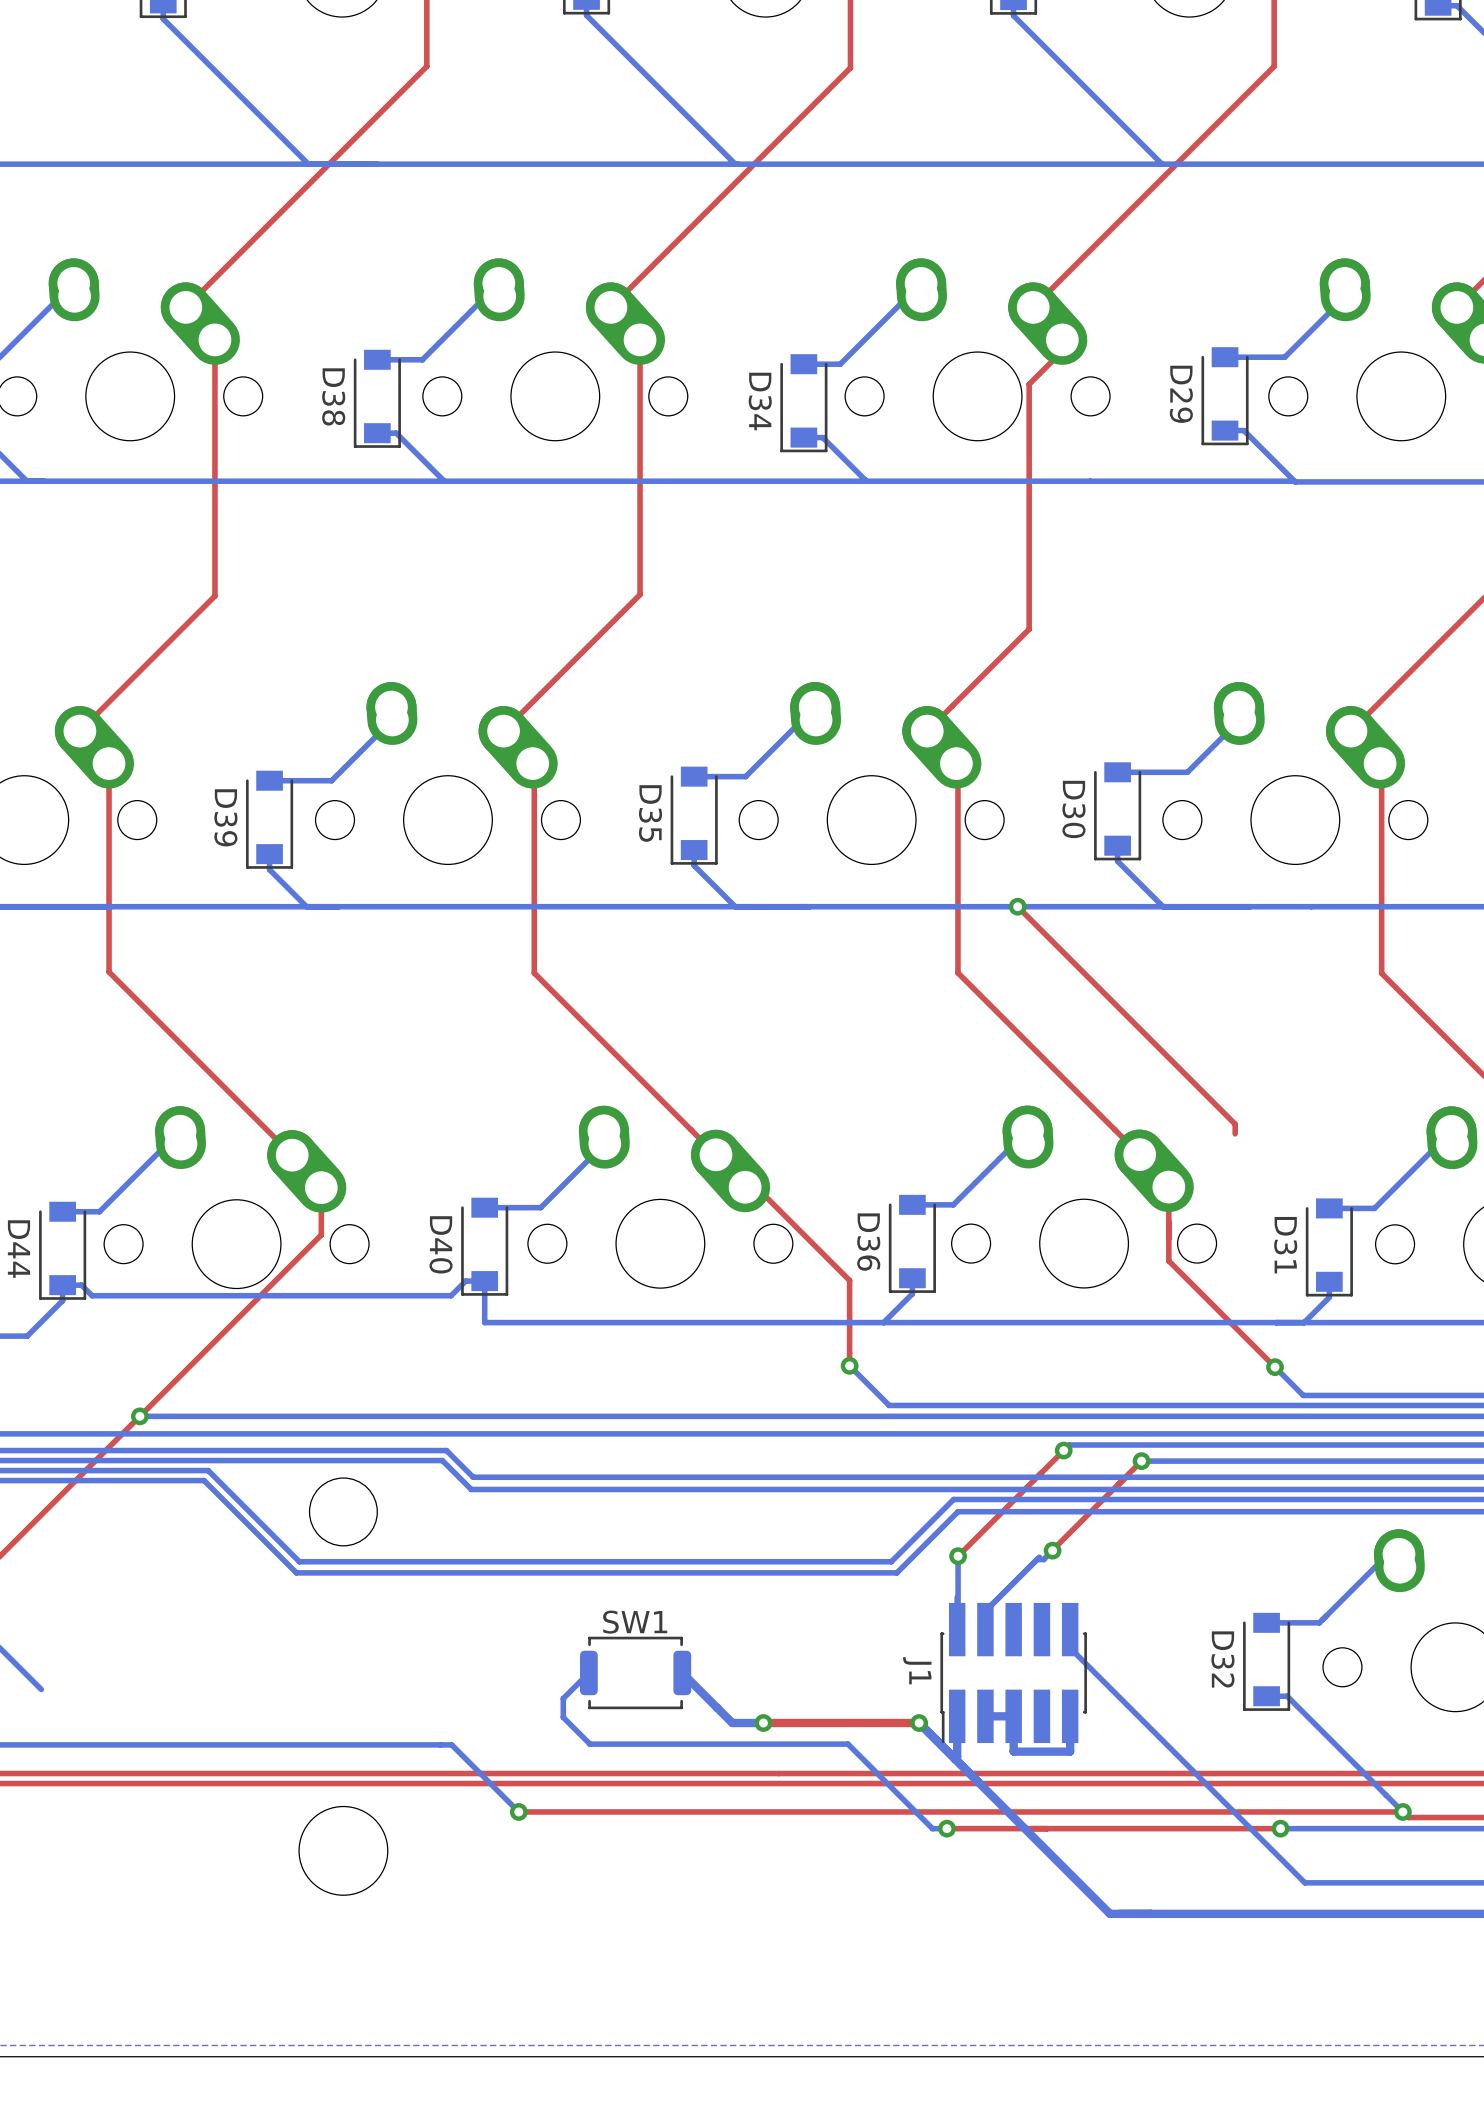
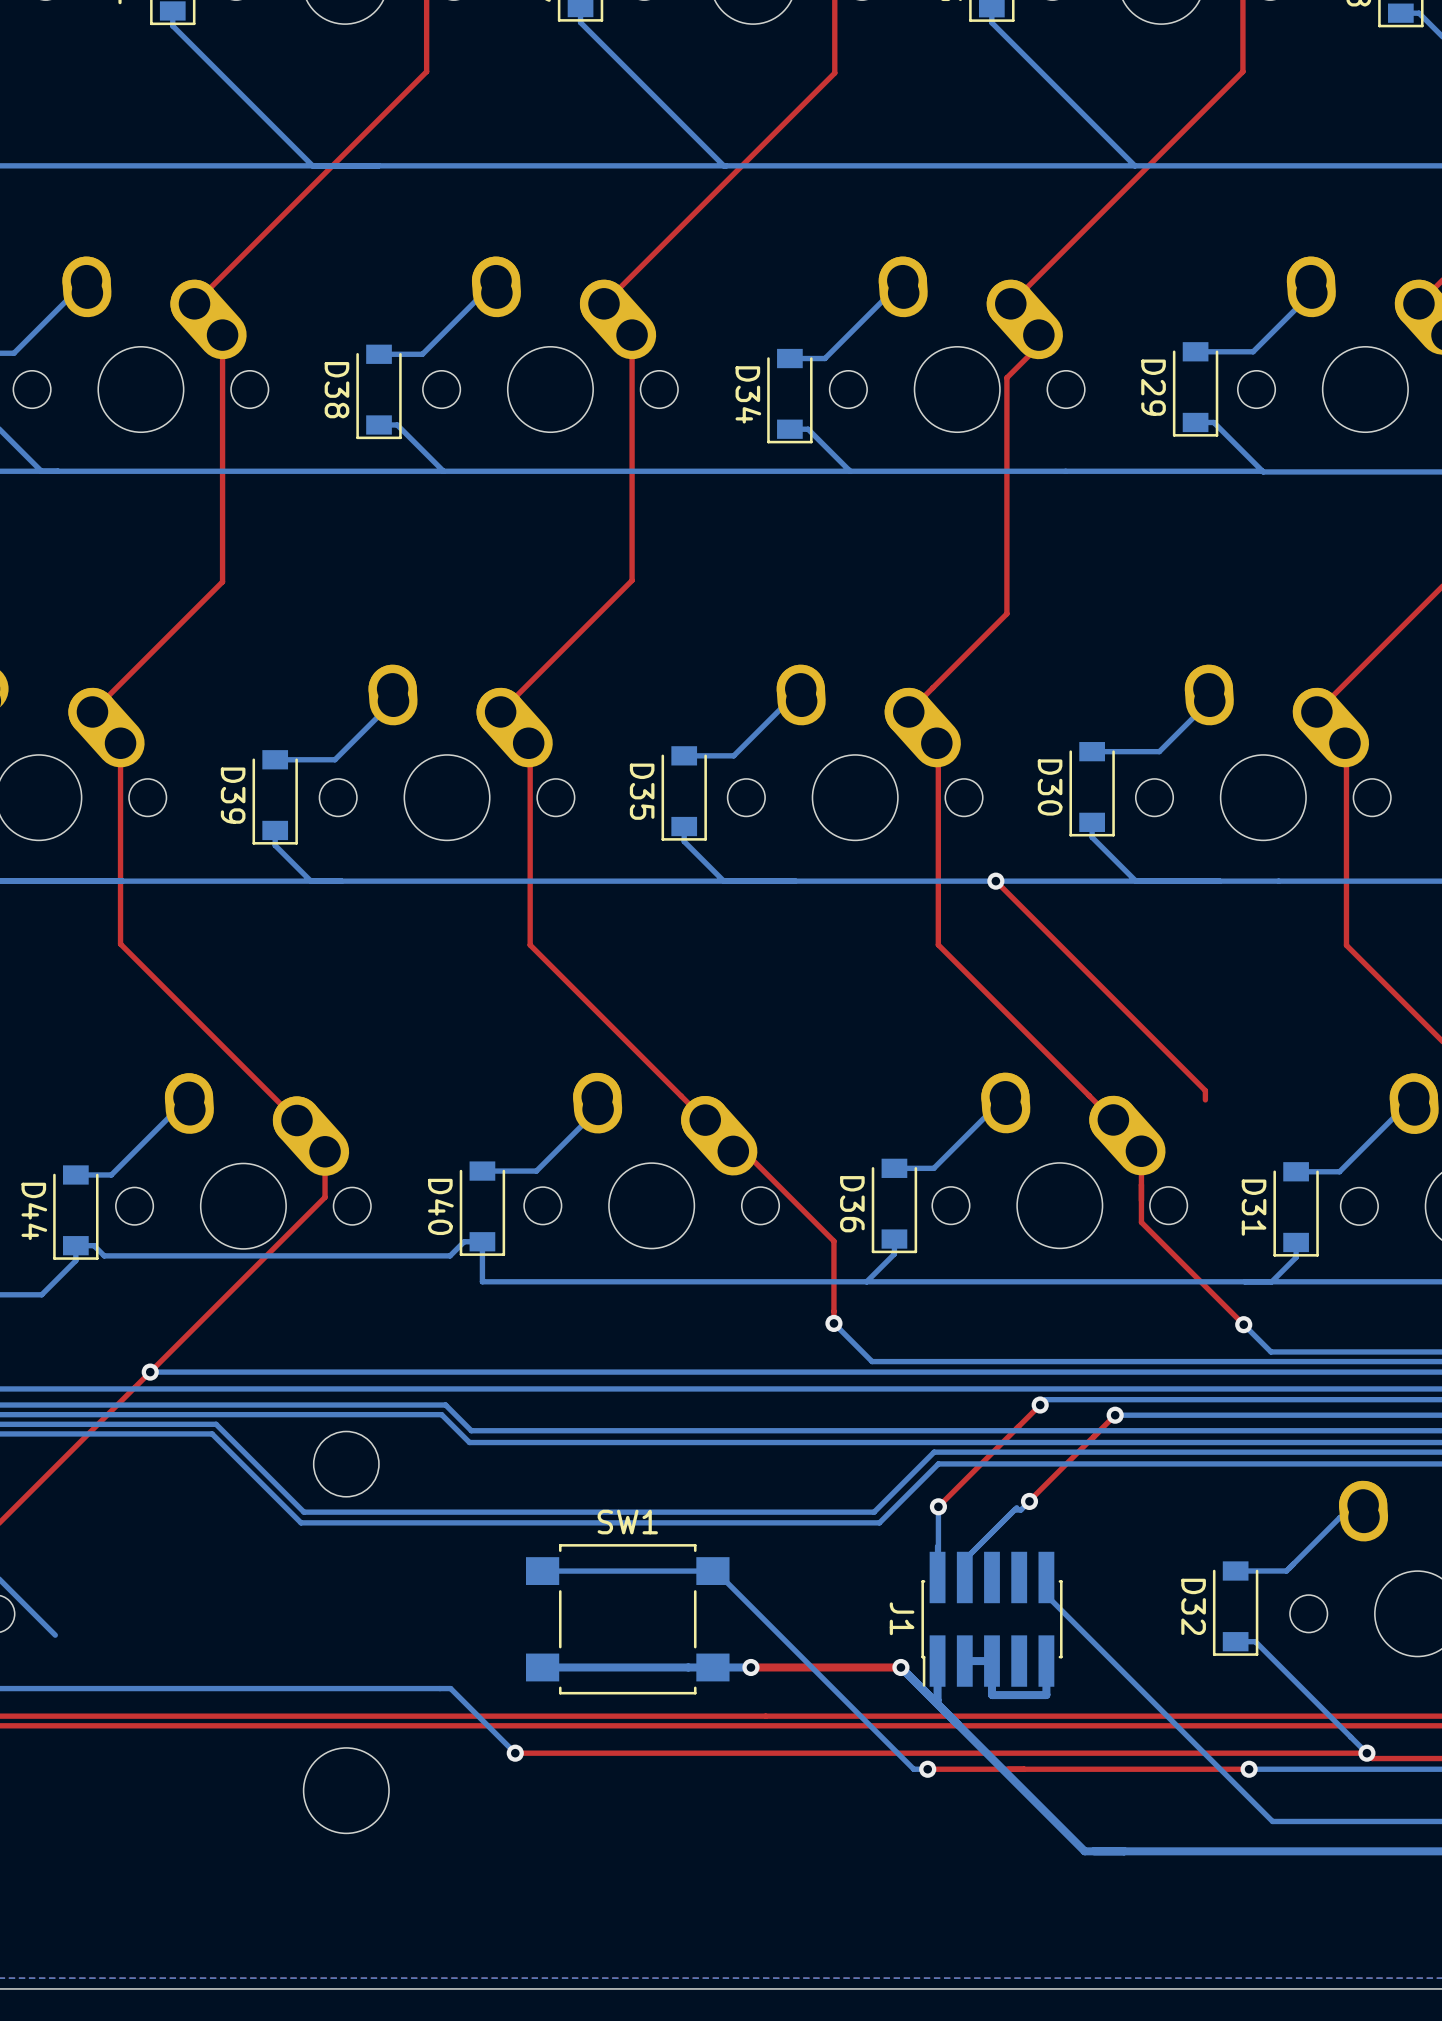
SW1 name position: SW1 (635, 1622) -> SW1 (627, 1522)
SW1 footprint: [579, 1636, 692, 1710] -> [526, 1544, 730, 1695]
bottom track: (588, 1672) (563, 1698) (563, 1717) (589, 1744) (847, 1744) -> (542, 1571) (715, 1571) (832, 1687)
bottom track: (682, 1672) (732, 1723) -> (542, 1667) (720, 1667)

